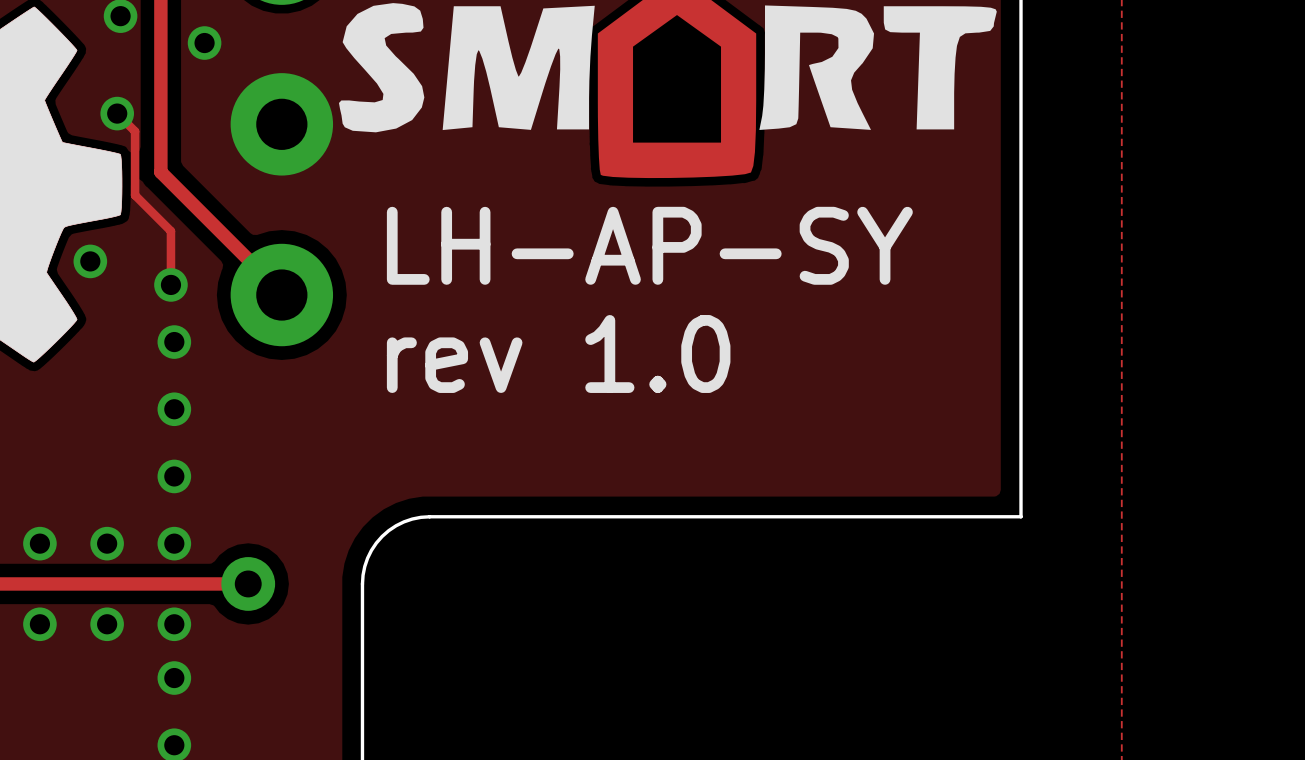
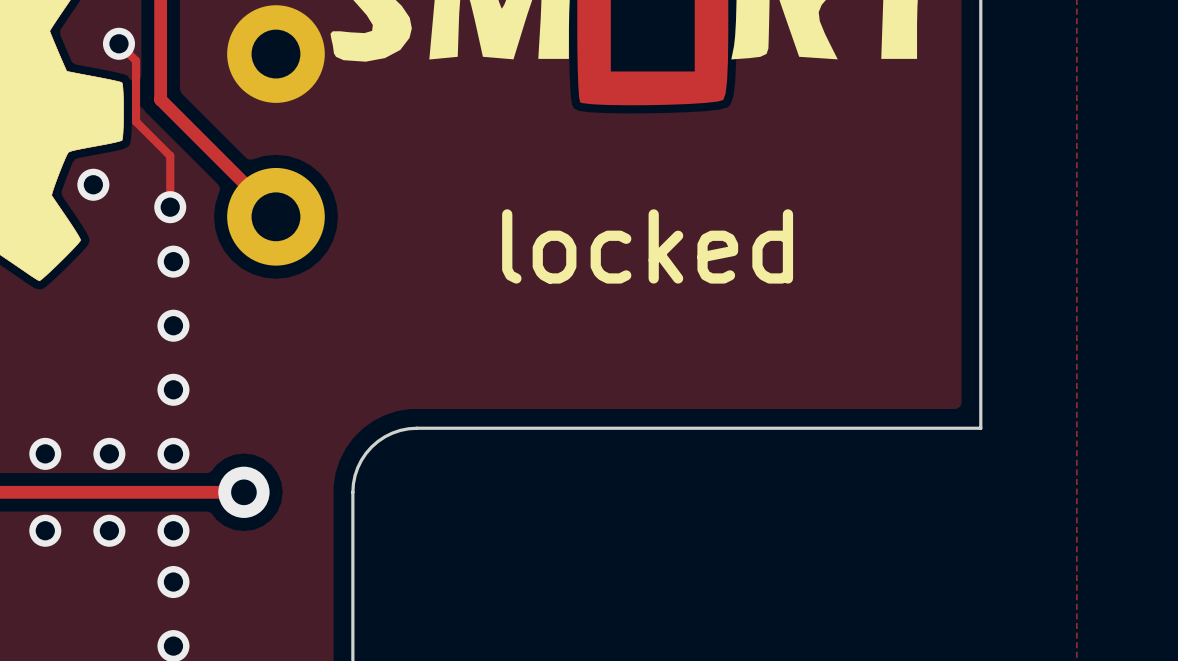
text: LH-AP-SY (649, 245) -> none
text: none -> locked (647, 246)
text: rev 1.0 (558, 353) -> none

